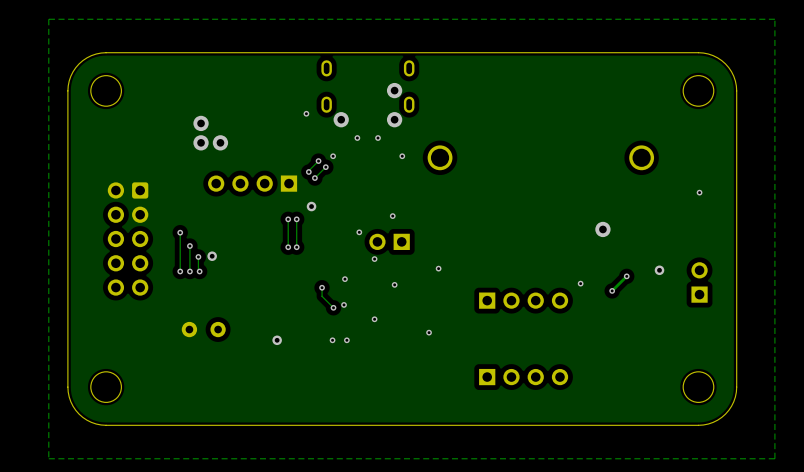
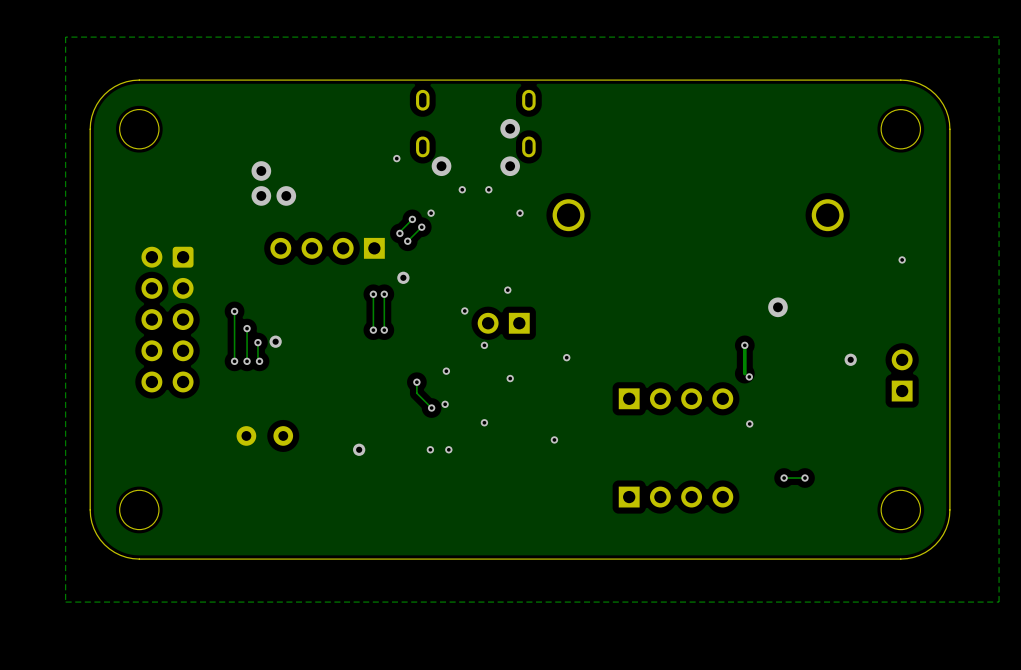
track: none -> (744, 345) (744, 373)
via: none -> (744, 345)
track: (626, 276) (612, 290) -> none
via: (626, 276) -> none
via: (612, 290) -> none
via: none -> (749, 423)
via: none -> (784, 478)
track: none -> (804, 478) (784, 478)
via: none -> (804, 478)

